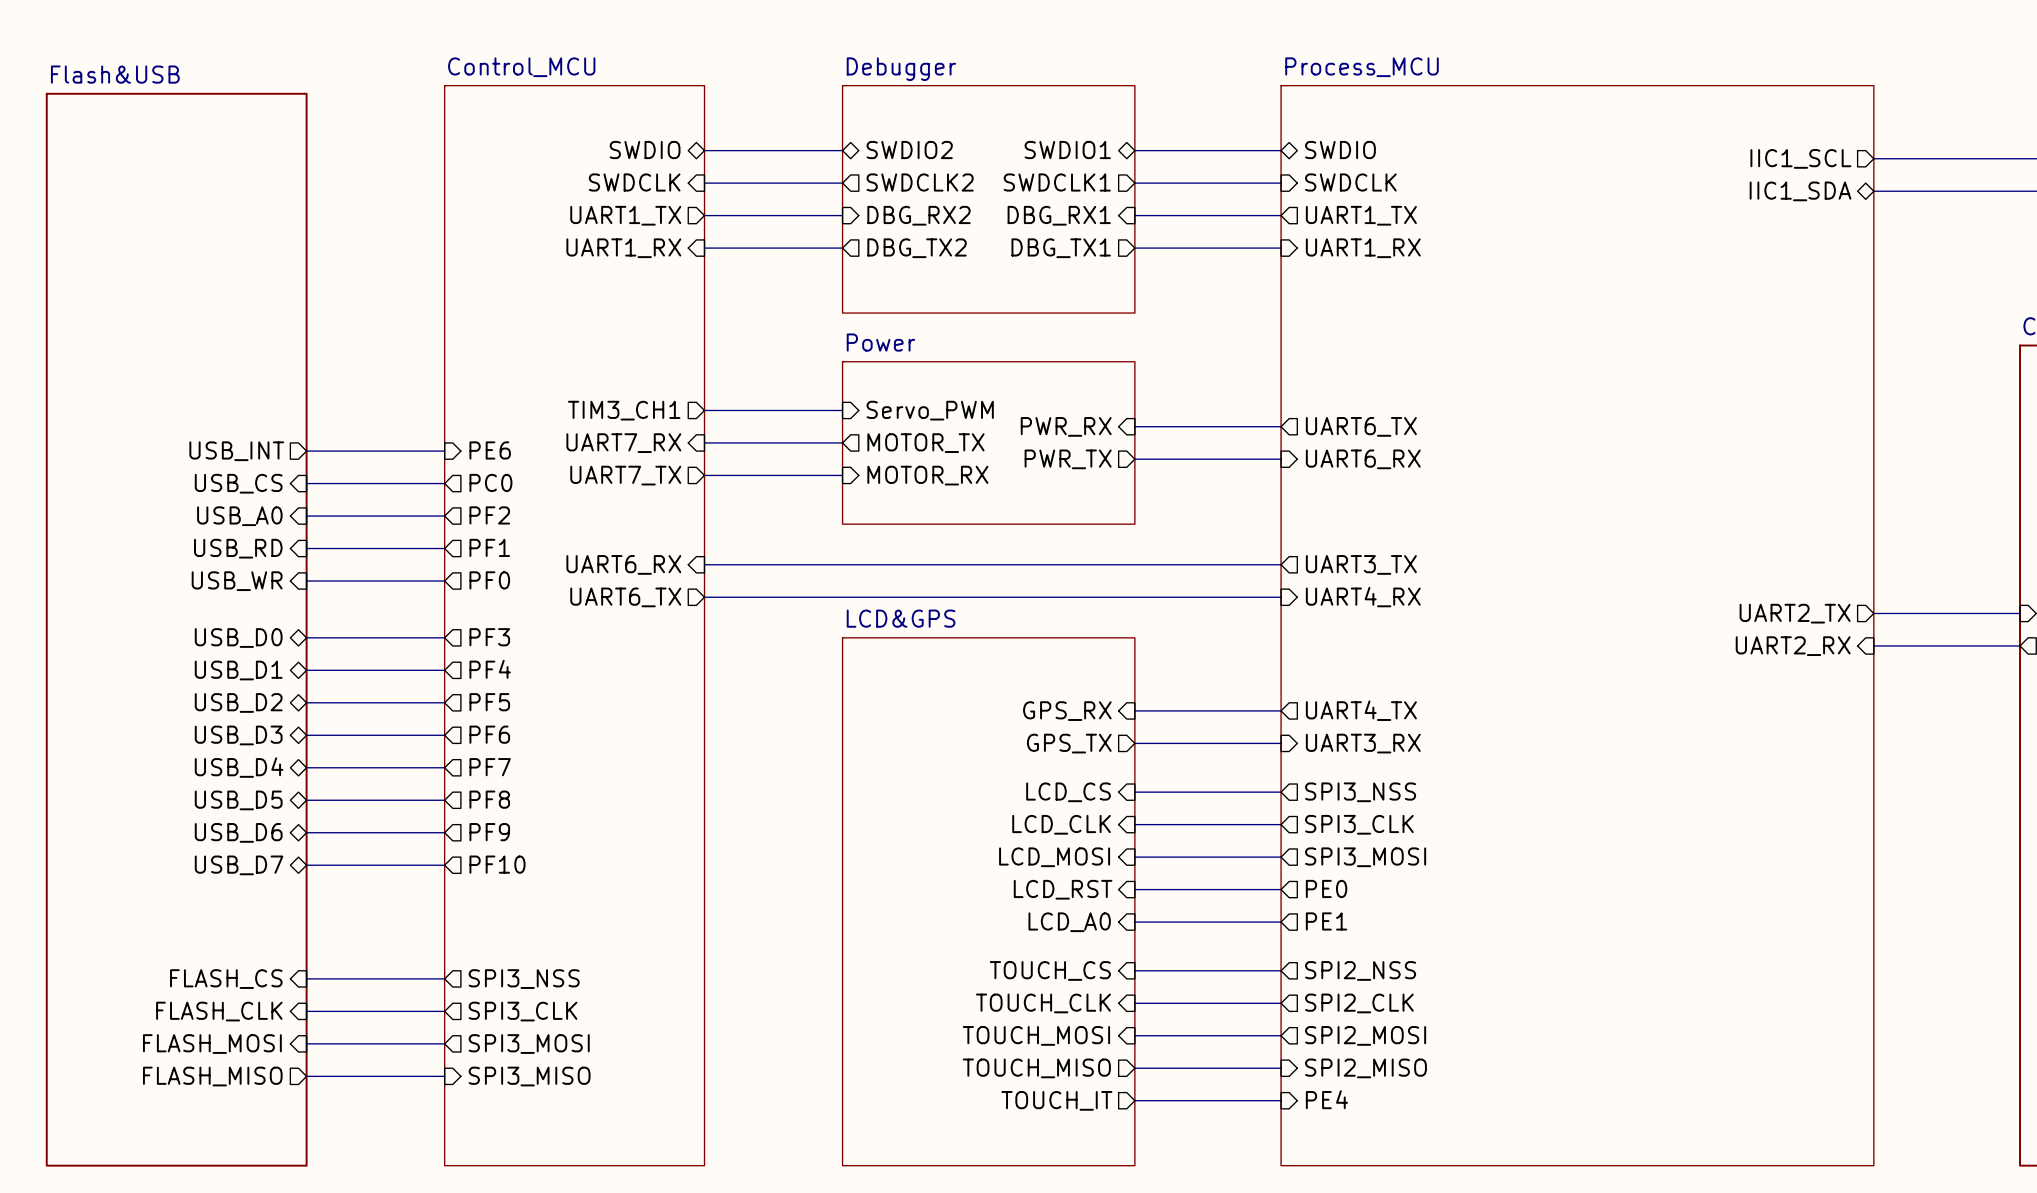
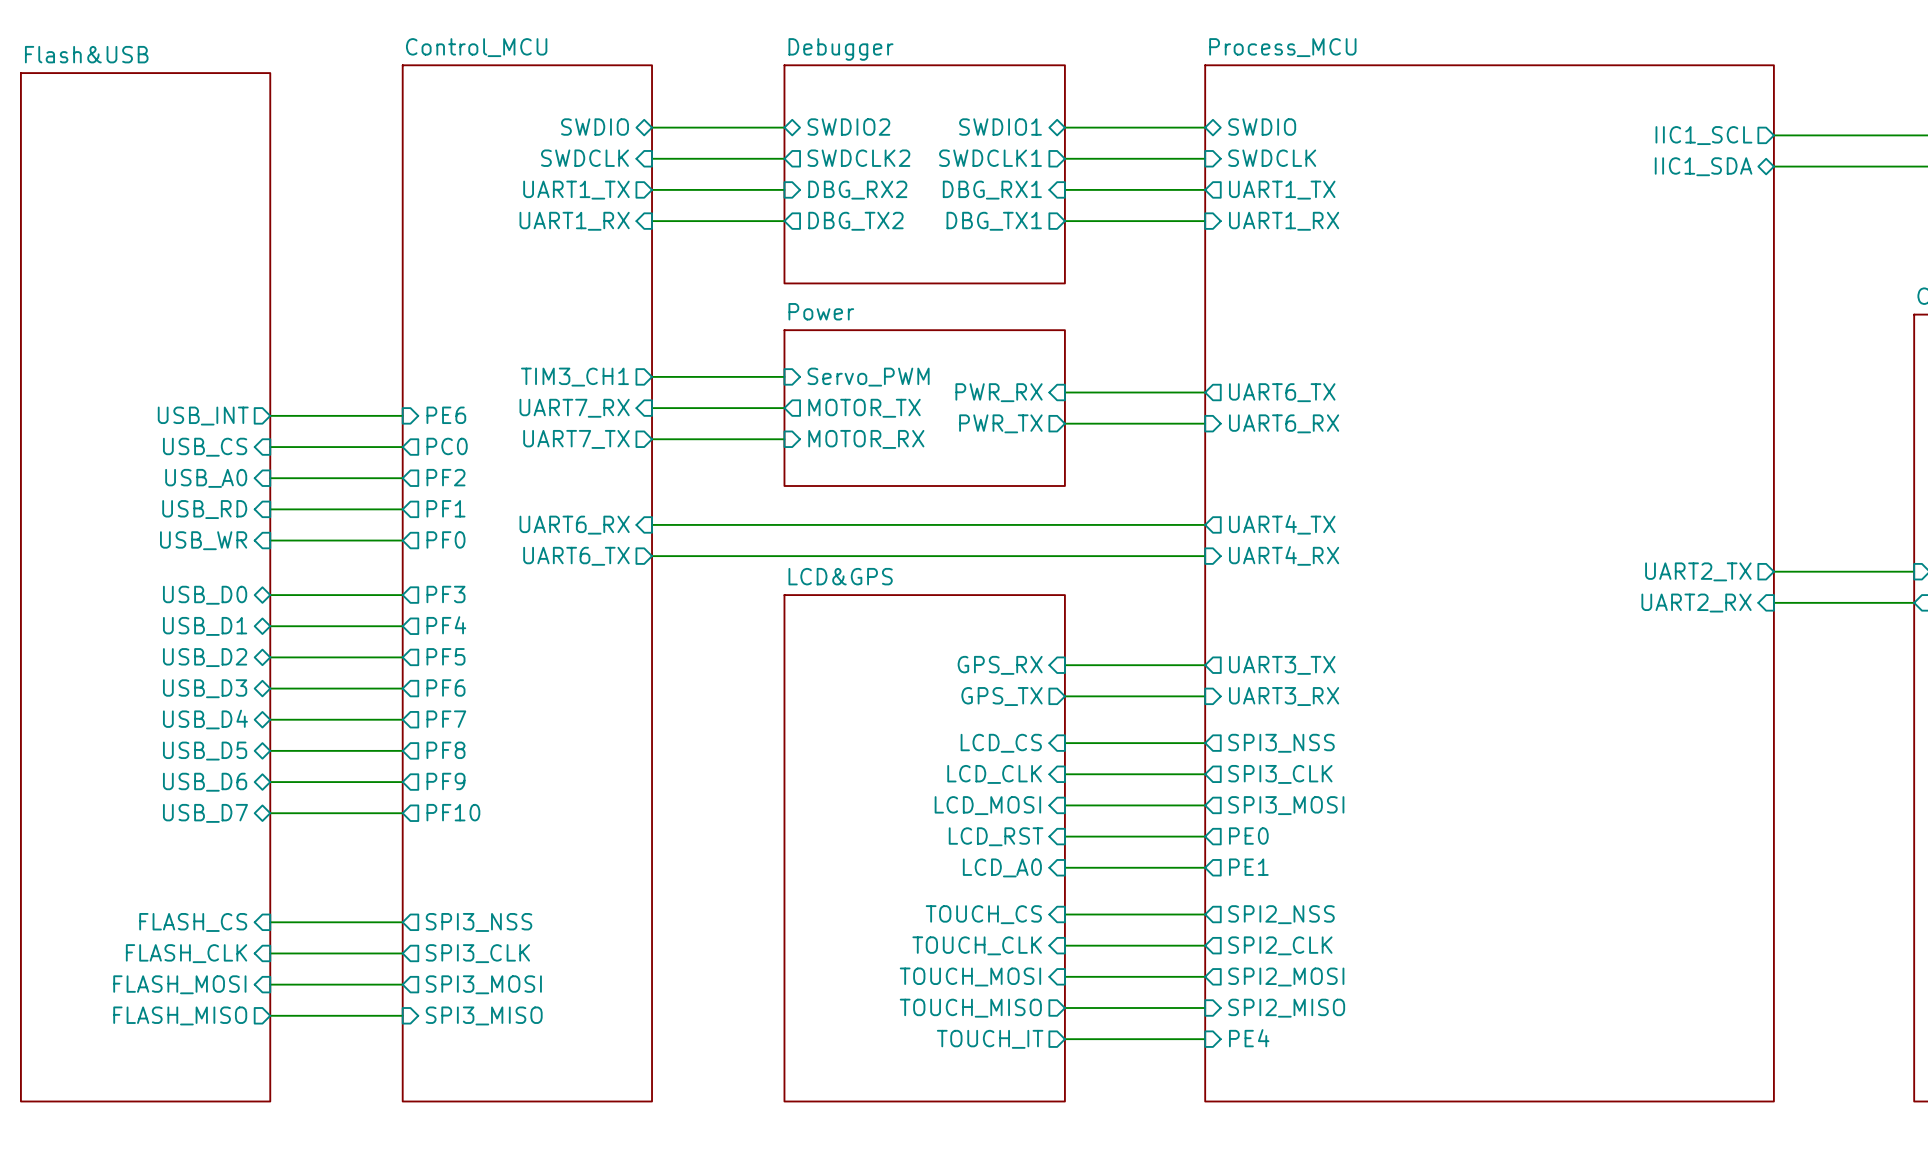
sheet pin: UART3_TX (1361, 564) -> UART4_TX (1282, 524)
sheet pin: UART4_TX (1361, 710) -> UART3_TX (1282, 665)

